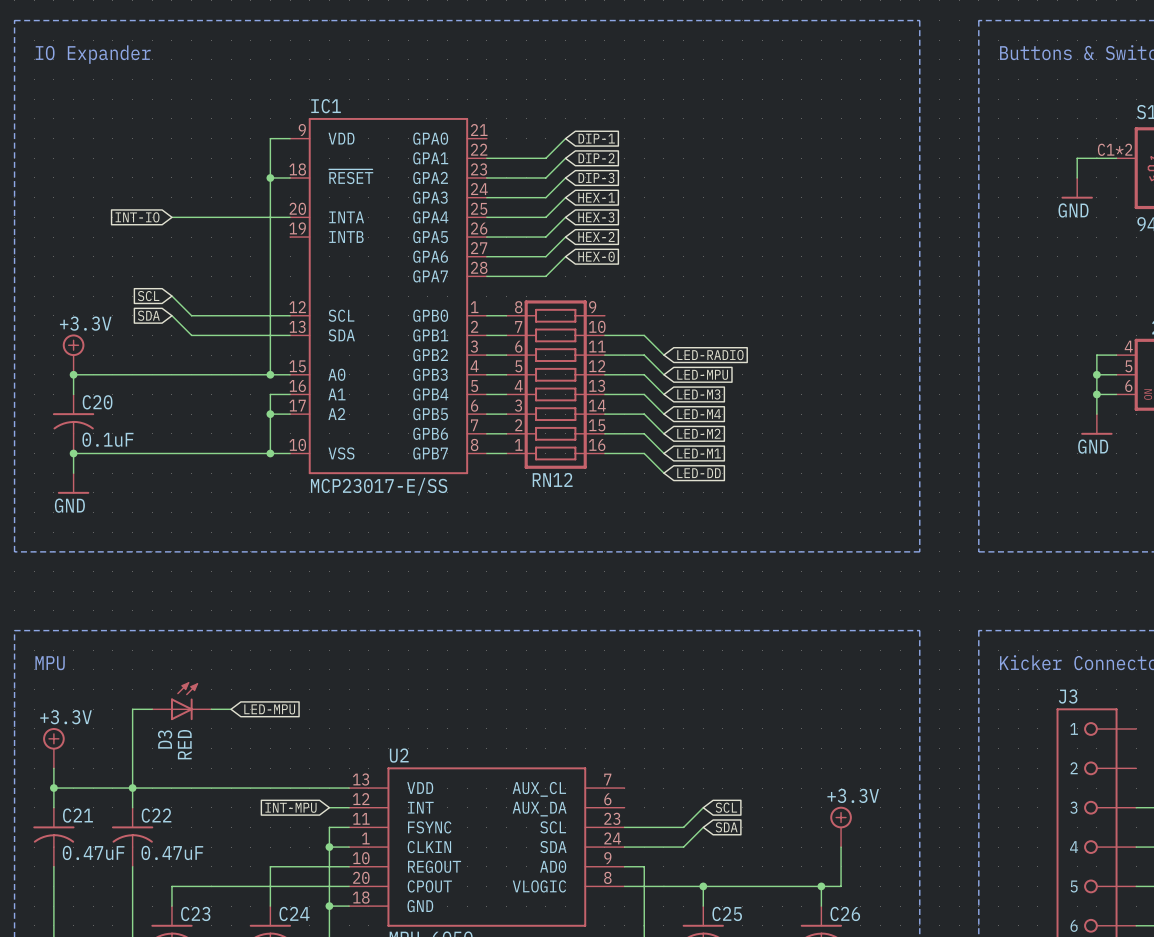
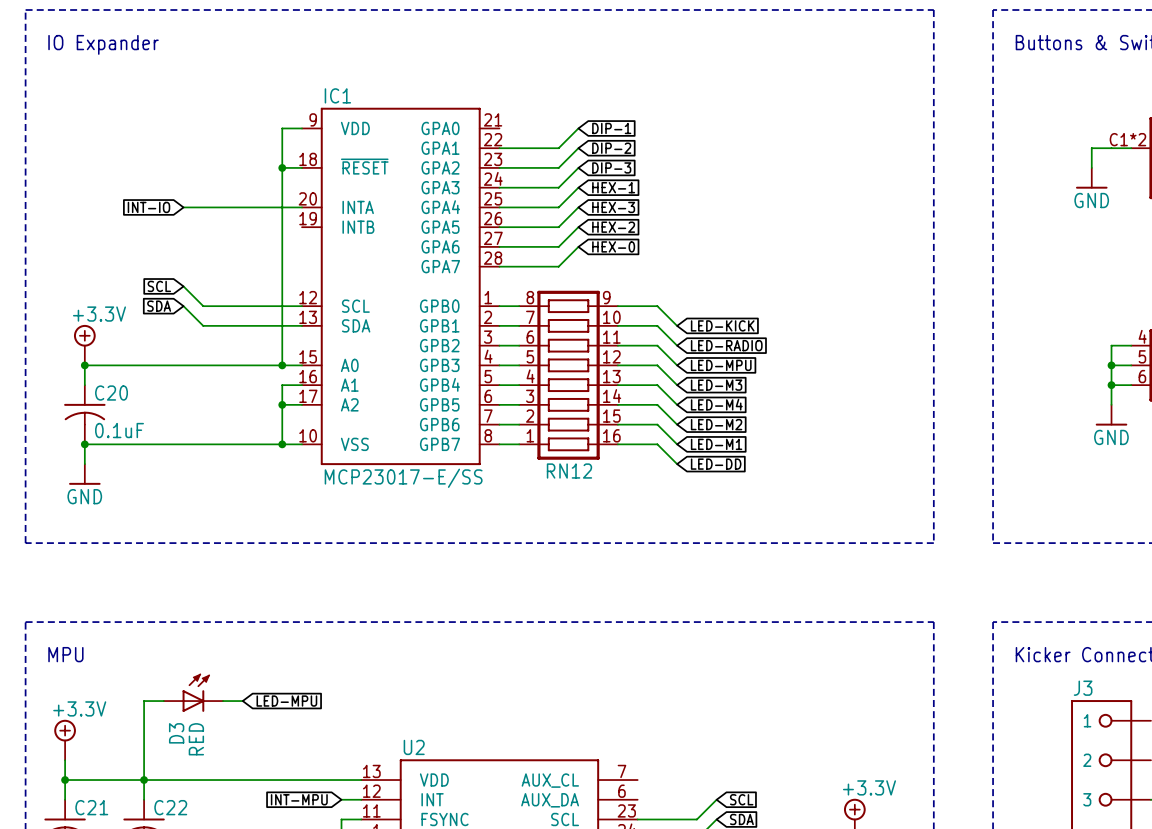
wire: none -> (617, 306) (657, 306) (677, 325)
global label: none -> LED-KICK (722, 325)

